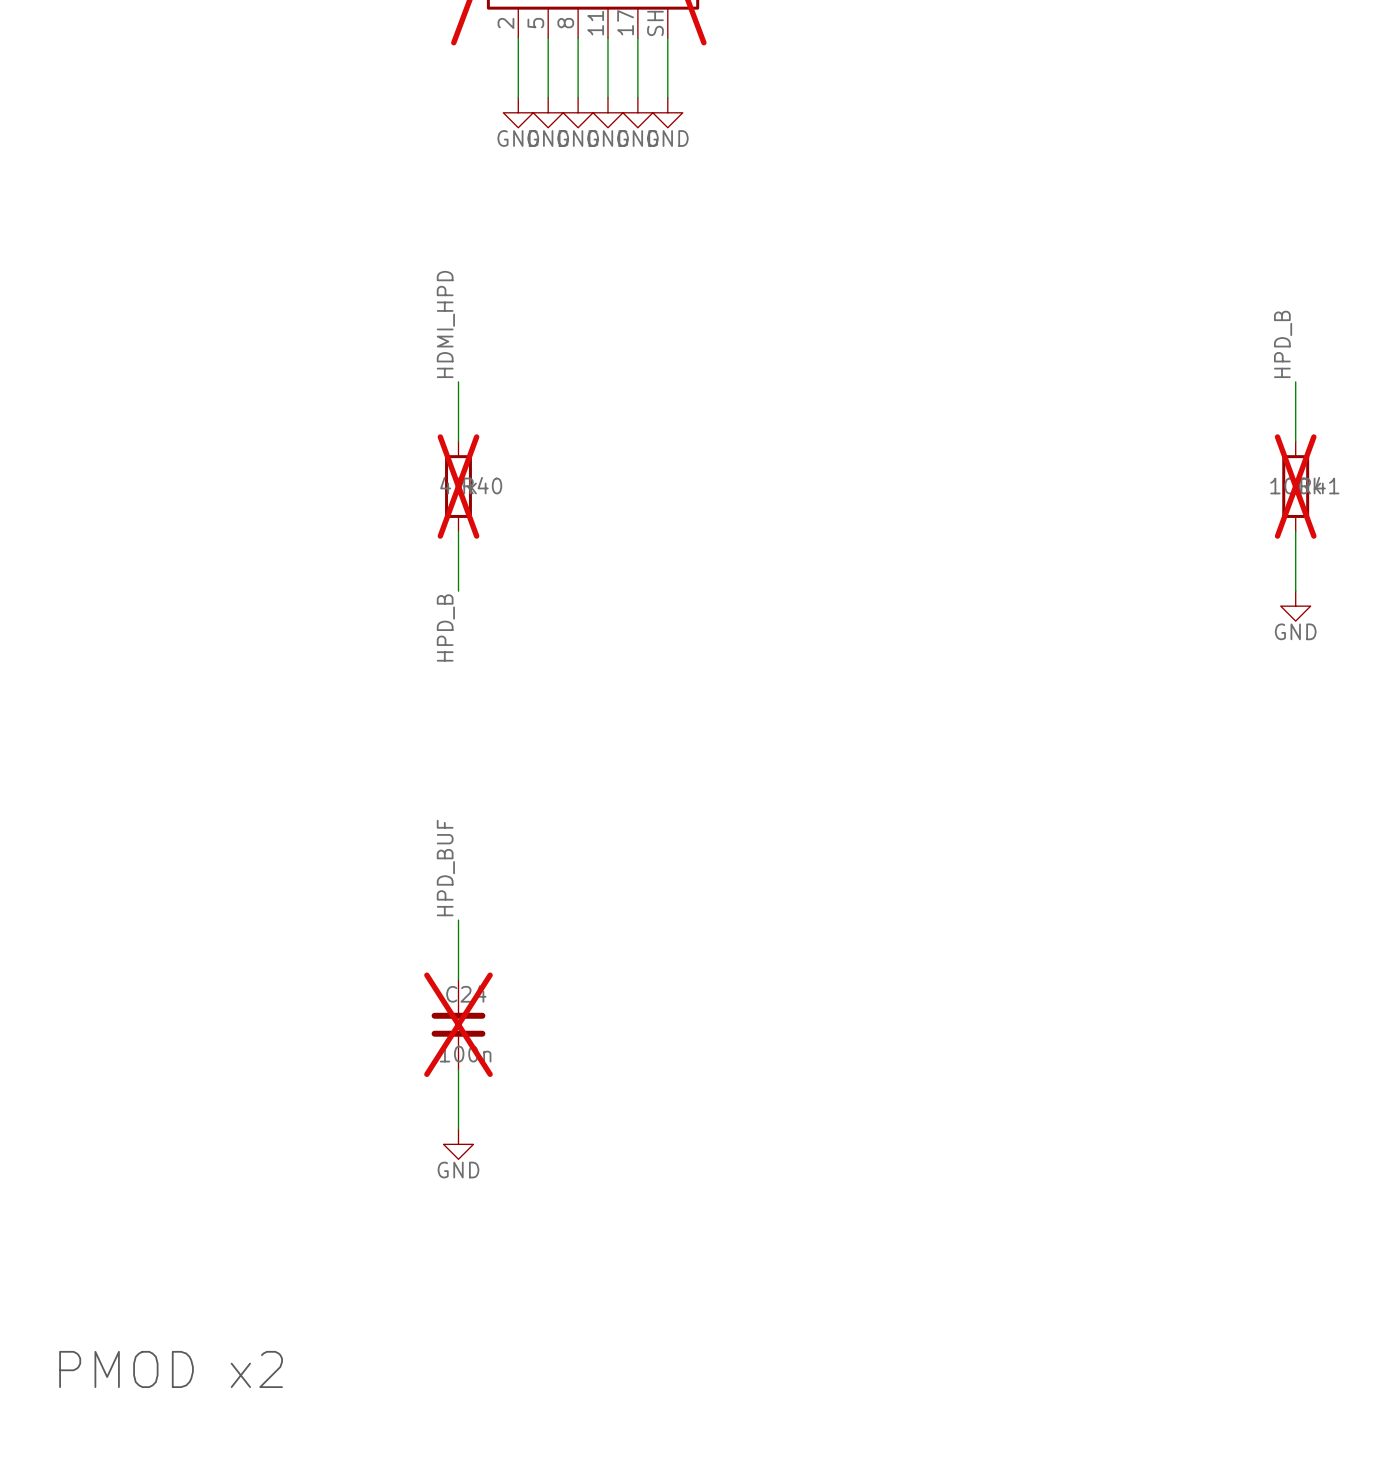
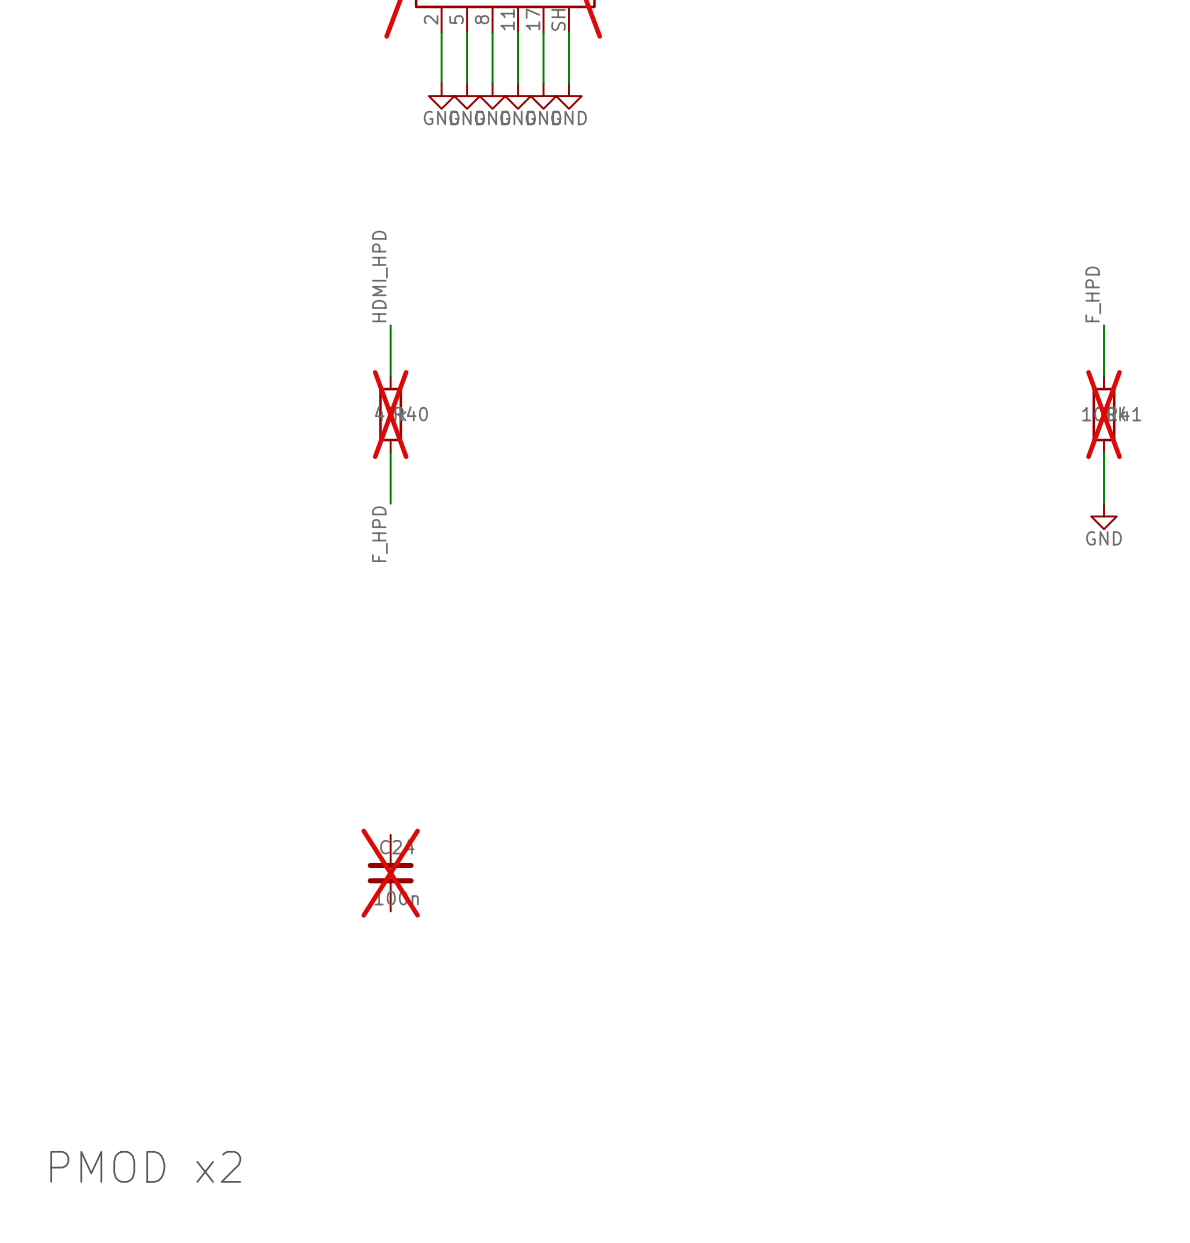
label: HPD_B (1283, 344) -> F_HPD (1093, 294)
label: HPD_B (445, 627) -> F_HPD (379, 534)
label: HPD_BUF (445, 868) -> none
wire: (458, 920) (458, 979) -> none
wire: (458, 1069) (458, 1129) -> none
power symbol: GND (458, 1144) -> none

